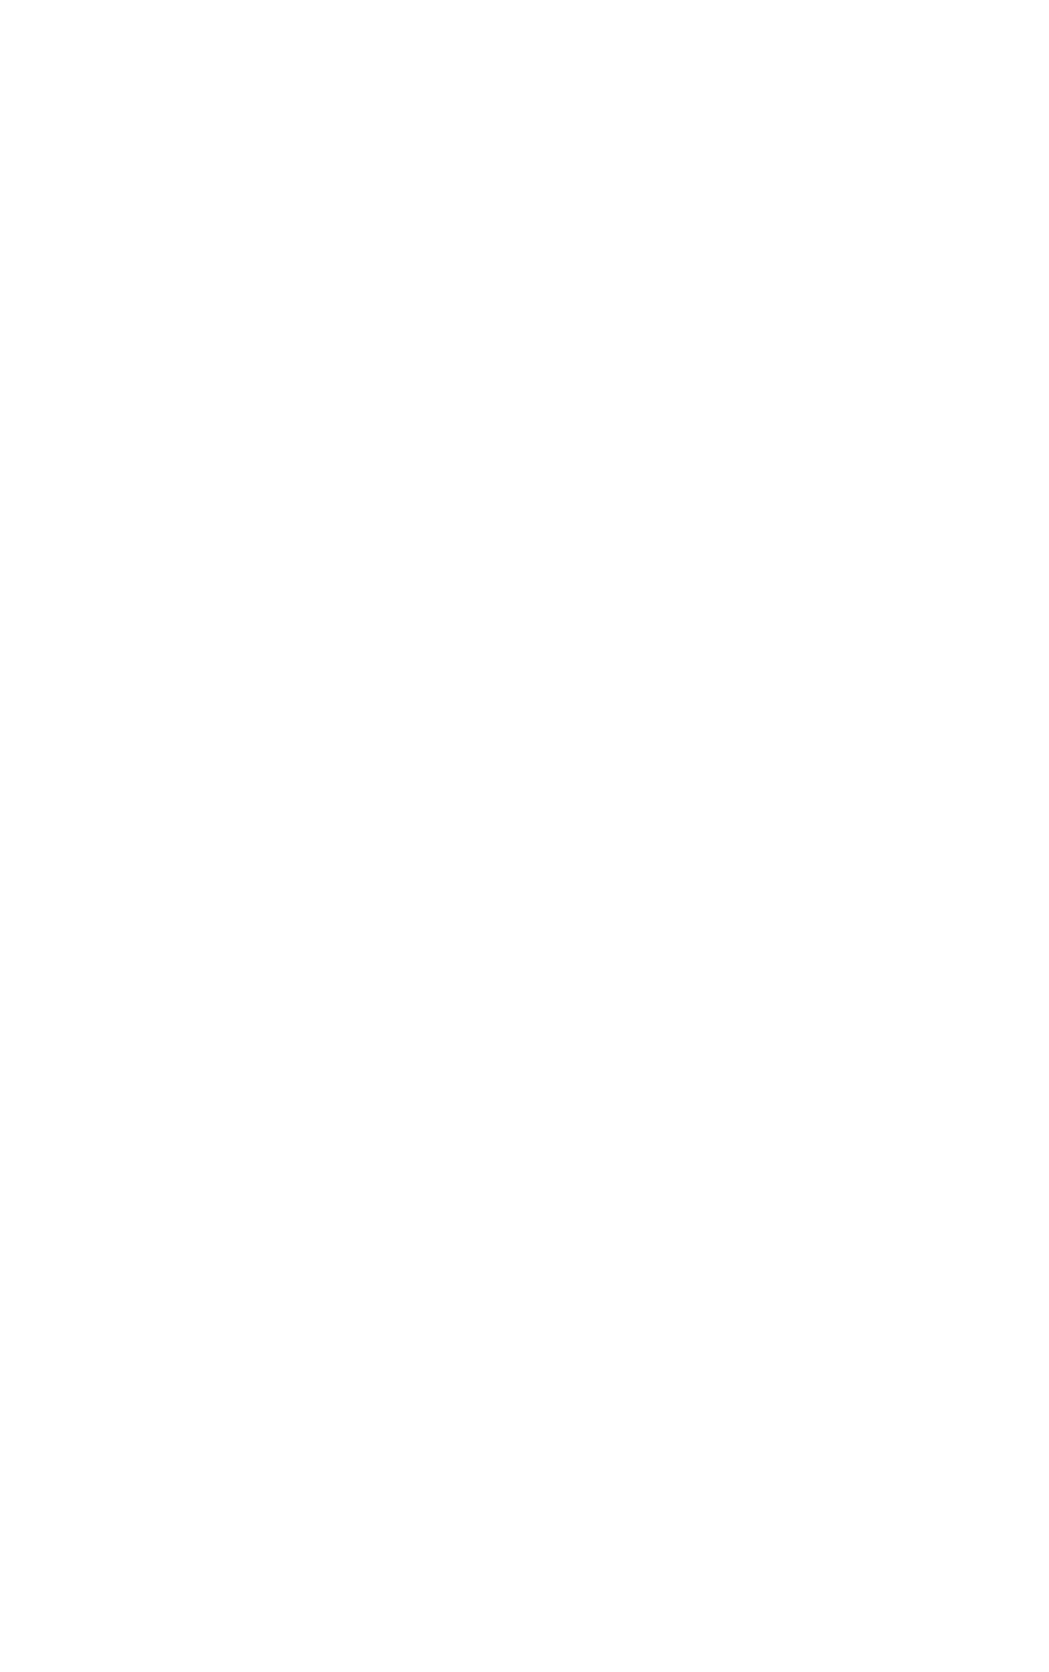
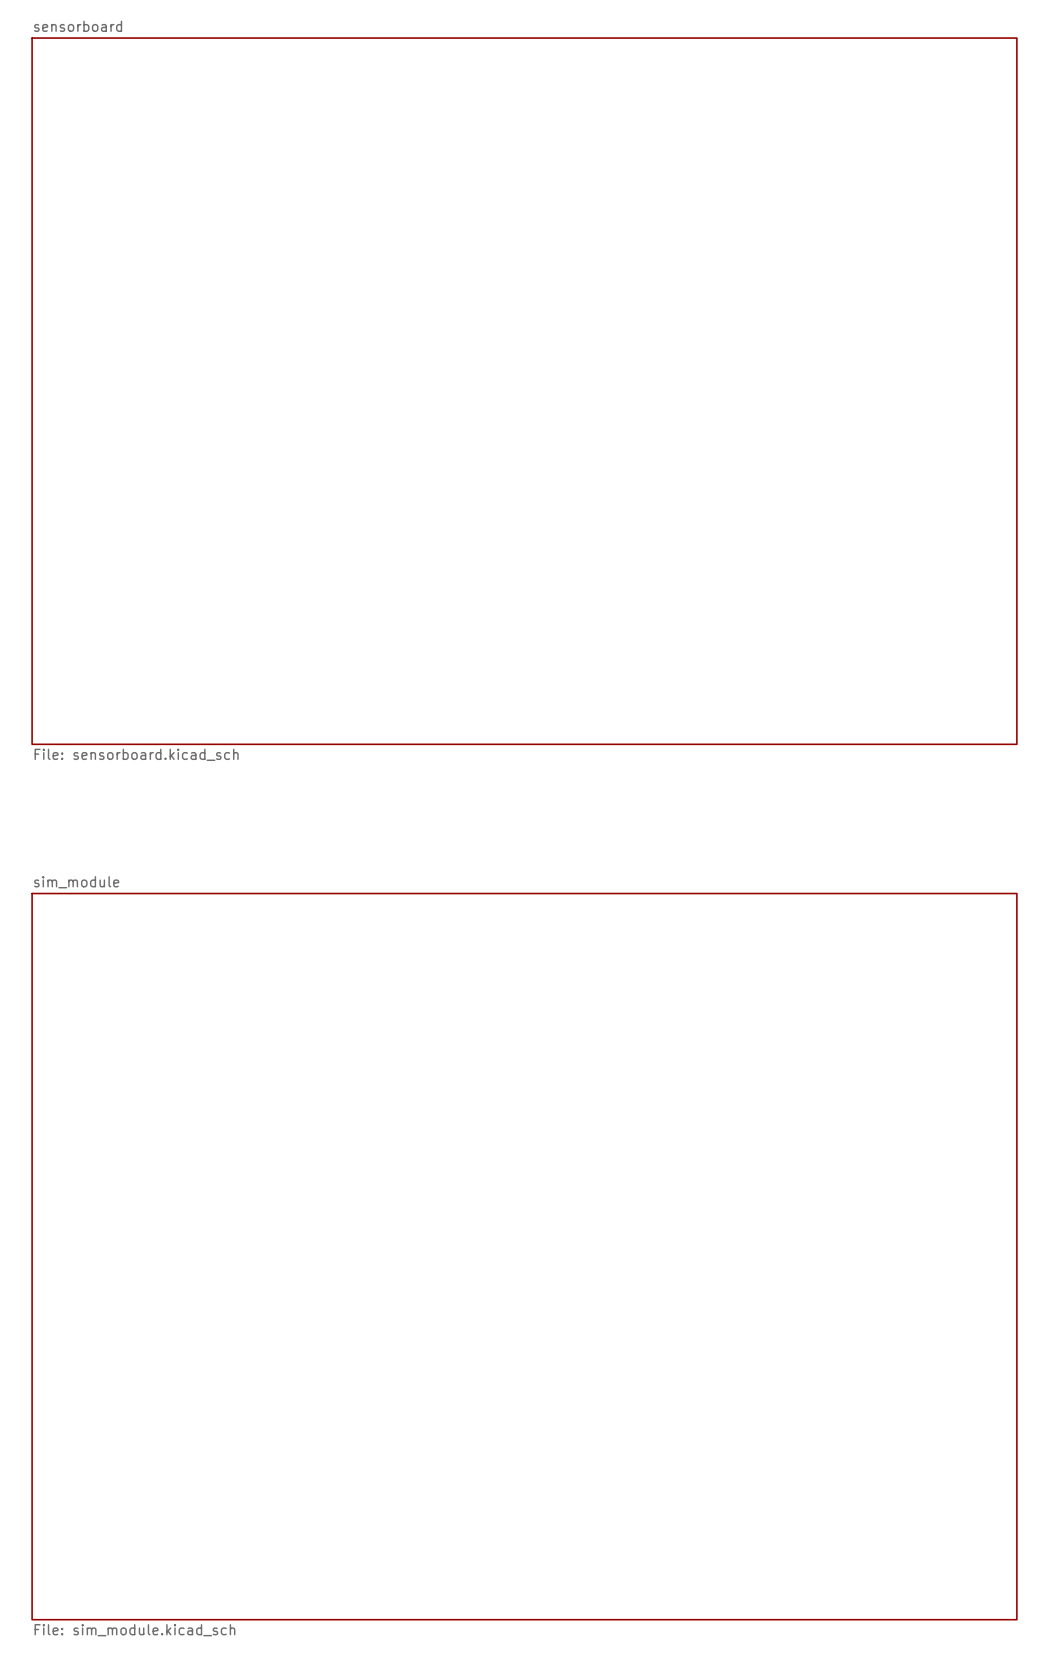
sheet sensorboard: none -> File: sensorboard.kicad_sch (524, 391)
sheet sim_module: none -> File: sim_module.kicad_sch (524, 1256)

